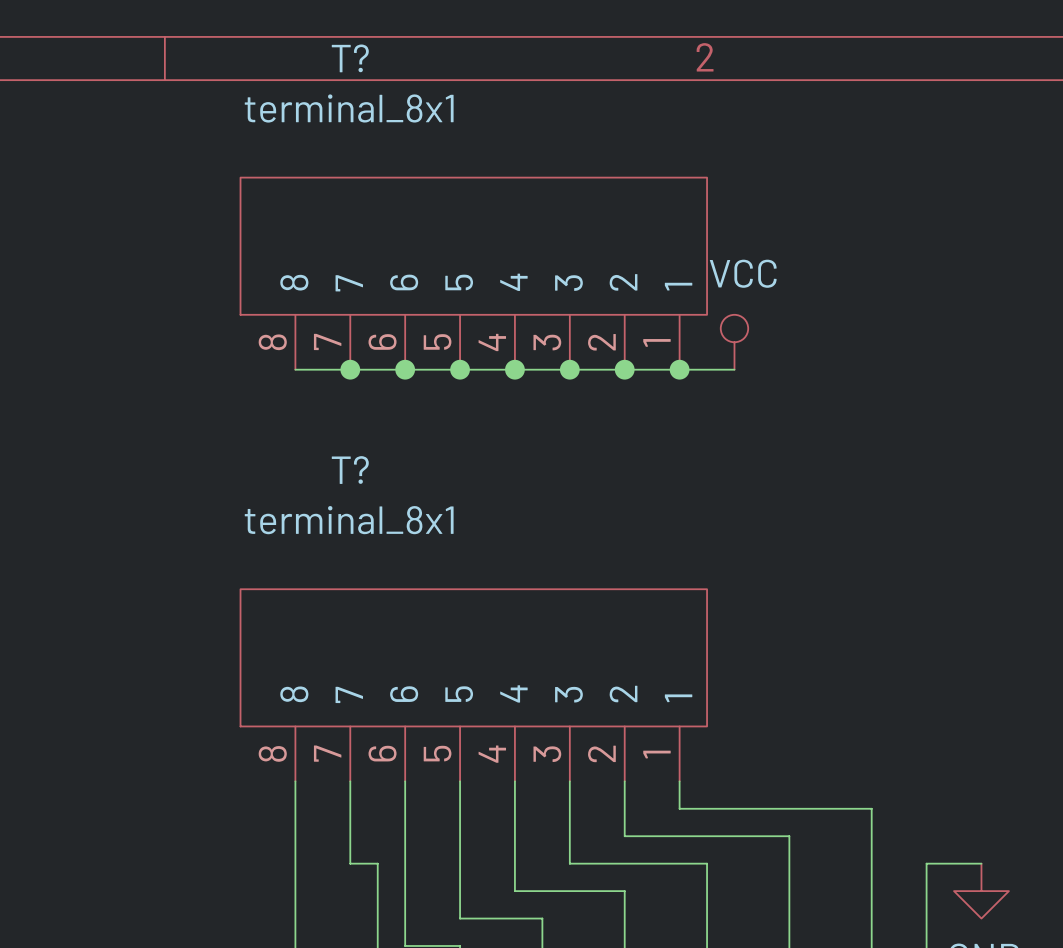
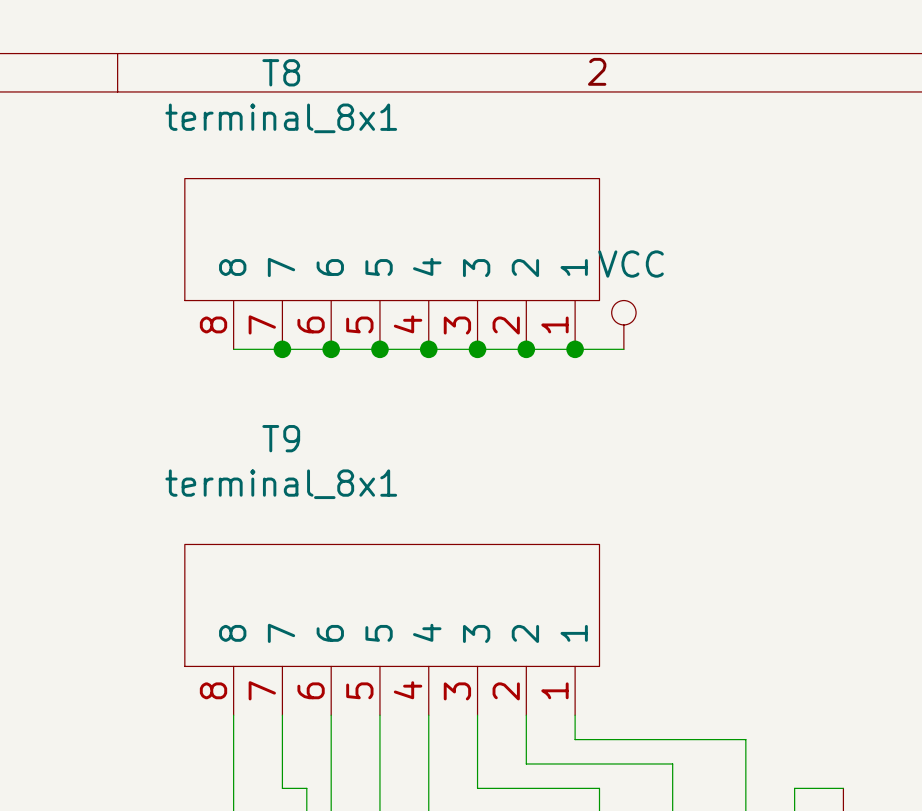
T? name: T? (350, 58) -> T8 (281, 72)
T? name: T? (350, 470) -> T9 (281, 438)

